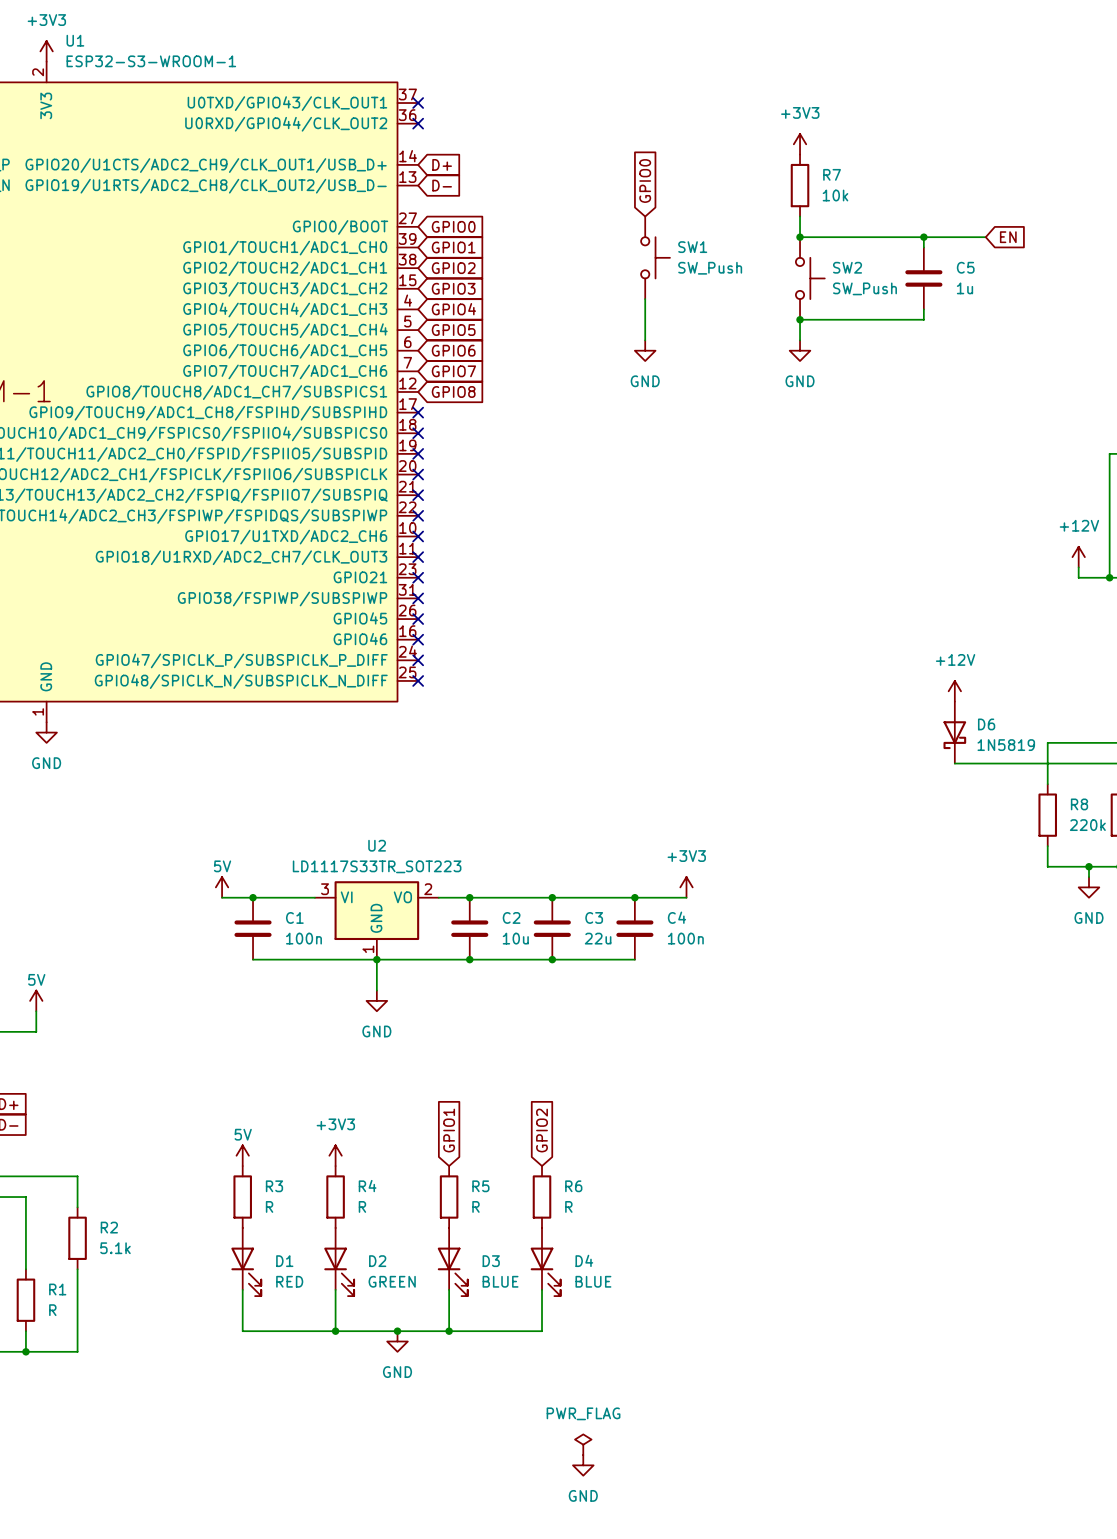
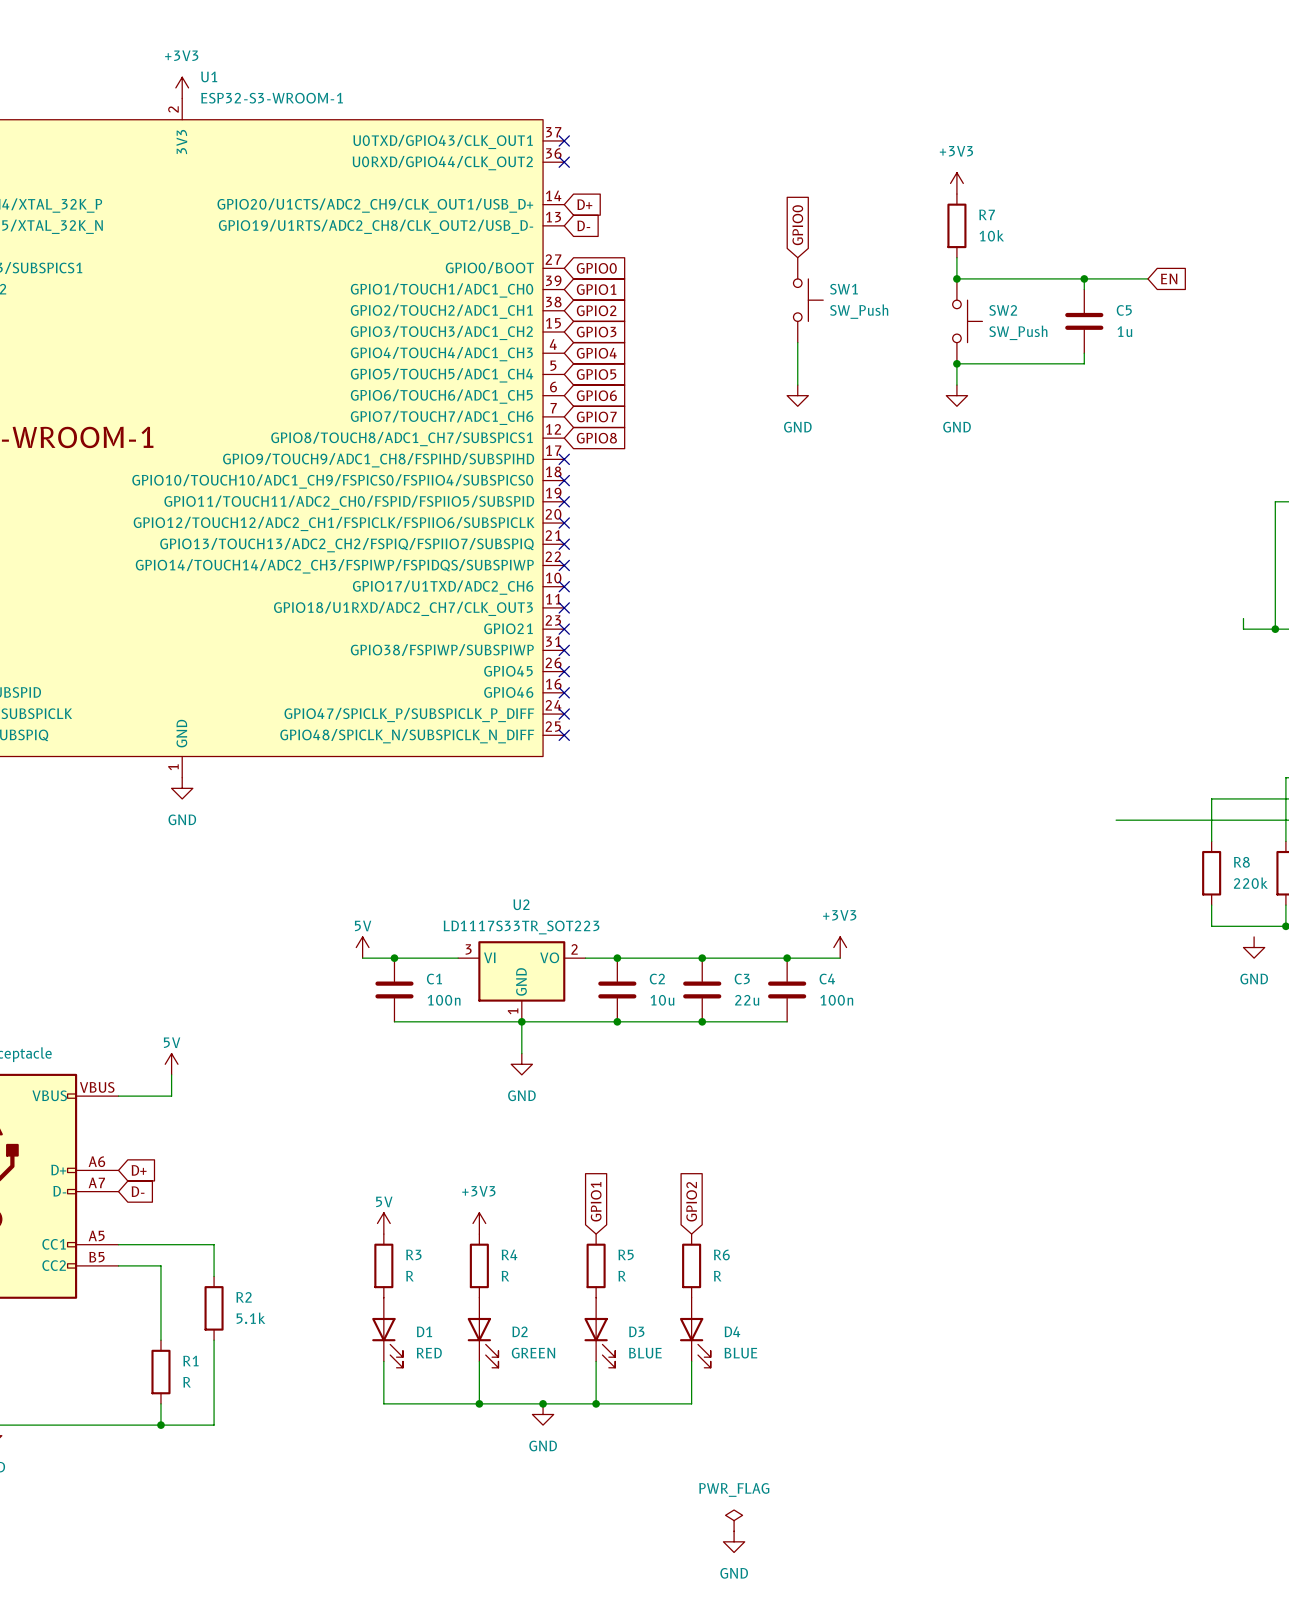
power symbol: +12V (1078, 557) -> none
power symbol: +12V (954, 691) -> none
D6: 1N5819 (954, 732) -> none
wire: (1089, 866) (1089, 877) -> none
junction: (1089, 866) -> none

